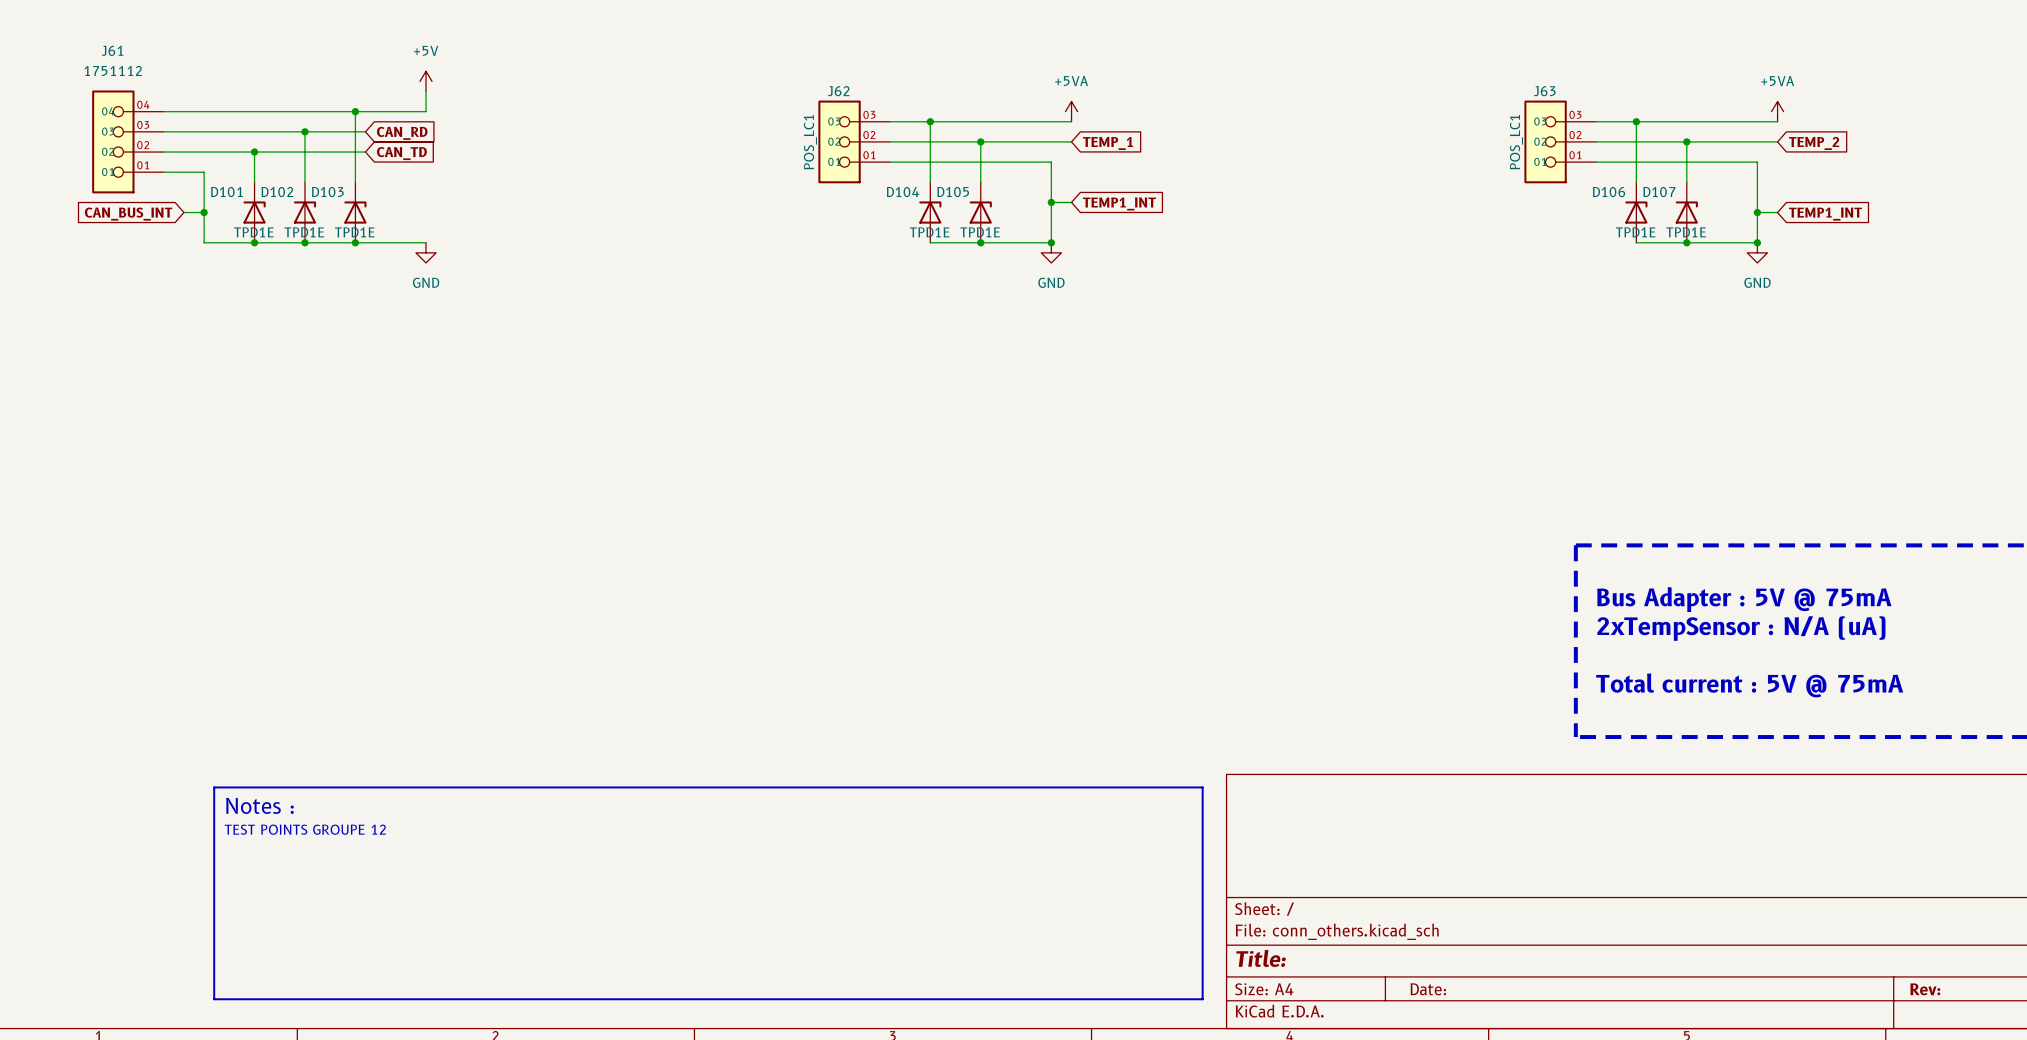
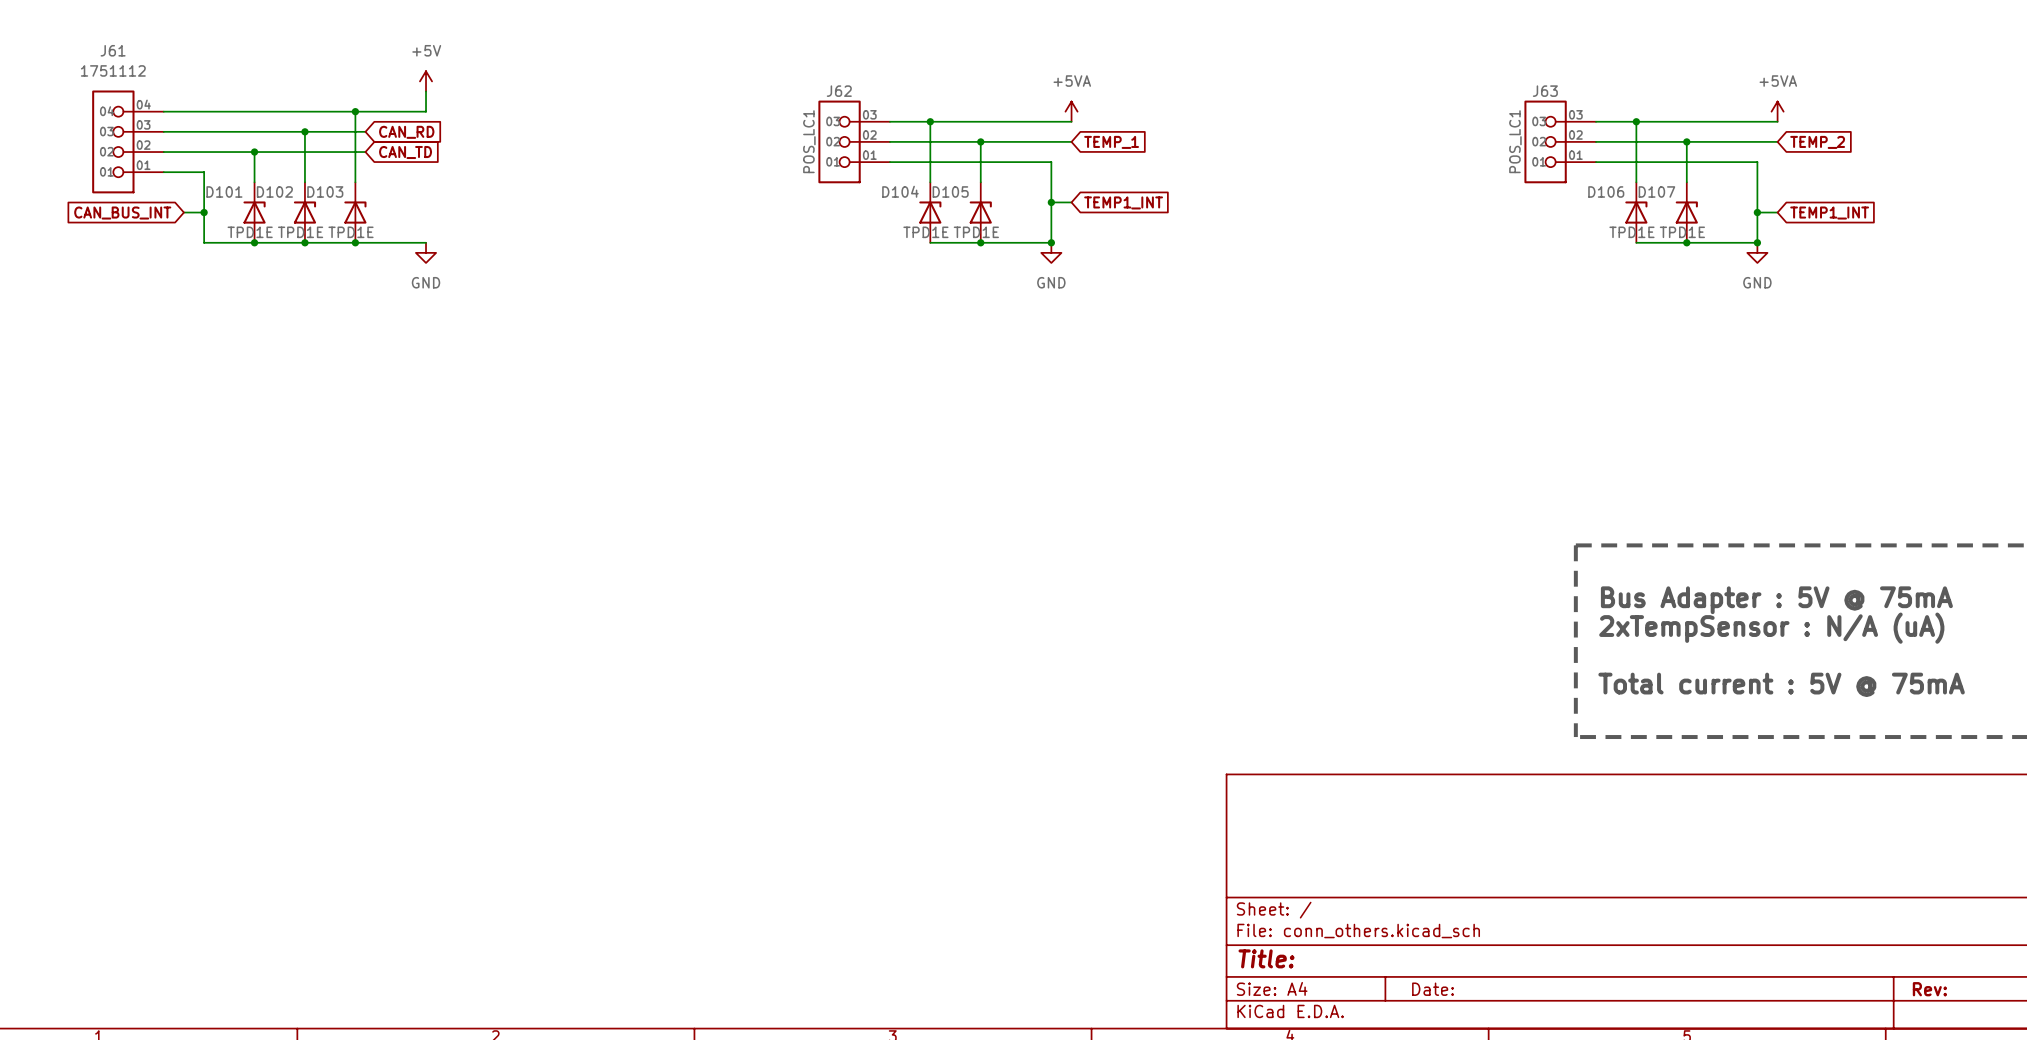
line: (214, 787) (1202, 787) (1202, 999) (214, 999) (214, 787) -> none
text: Notes : (259, 805) -> none
text: TEST POINTS GROUPE 12 (305, 829) -> none

